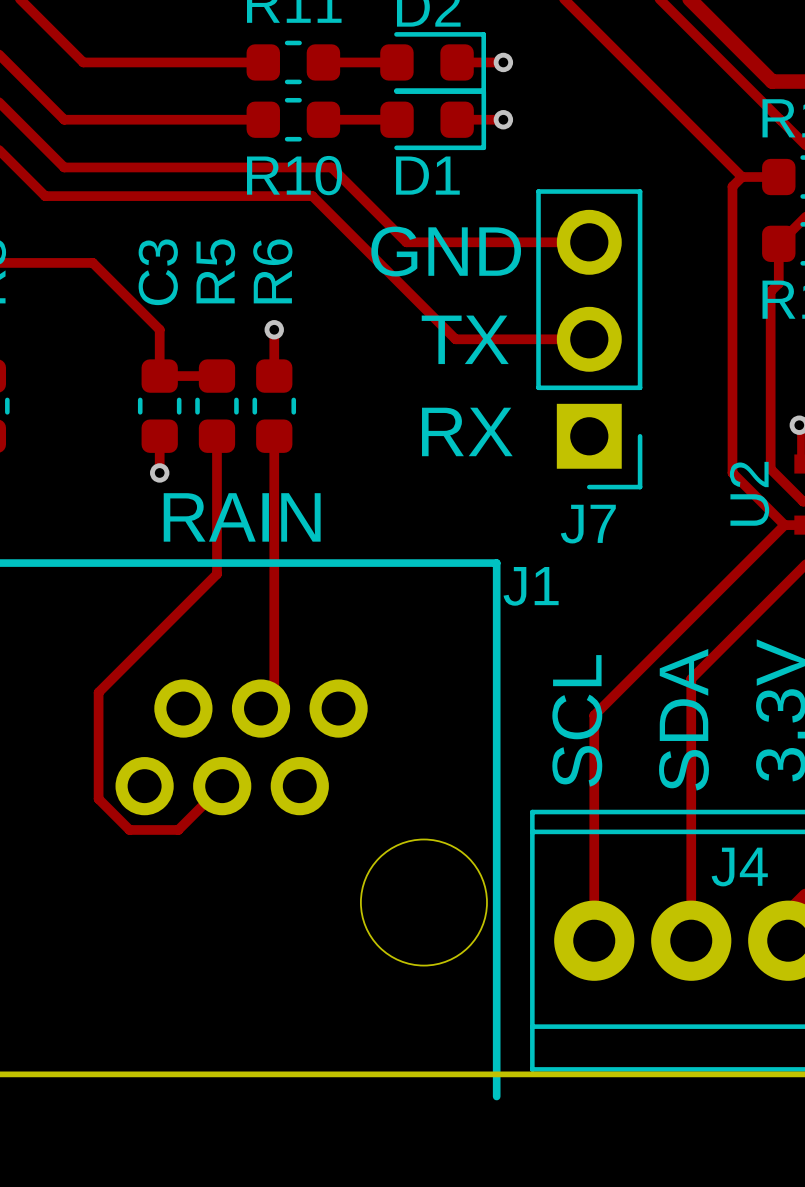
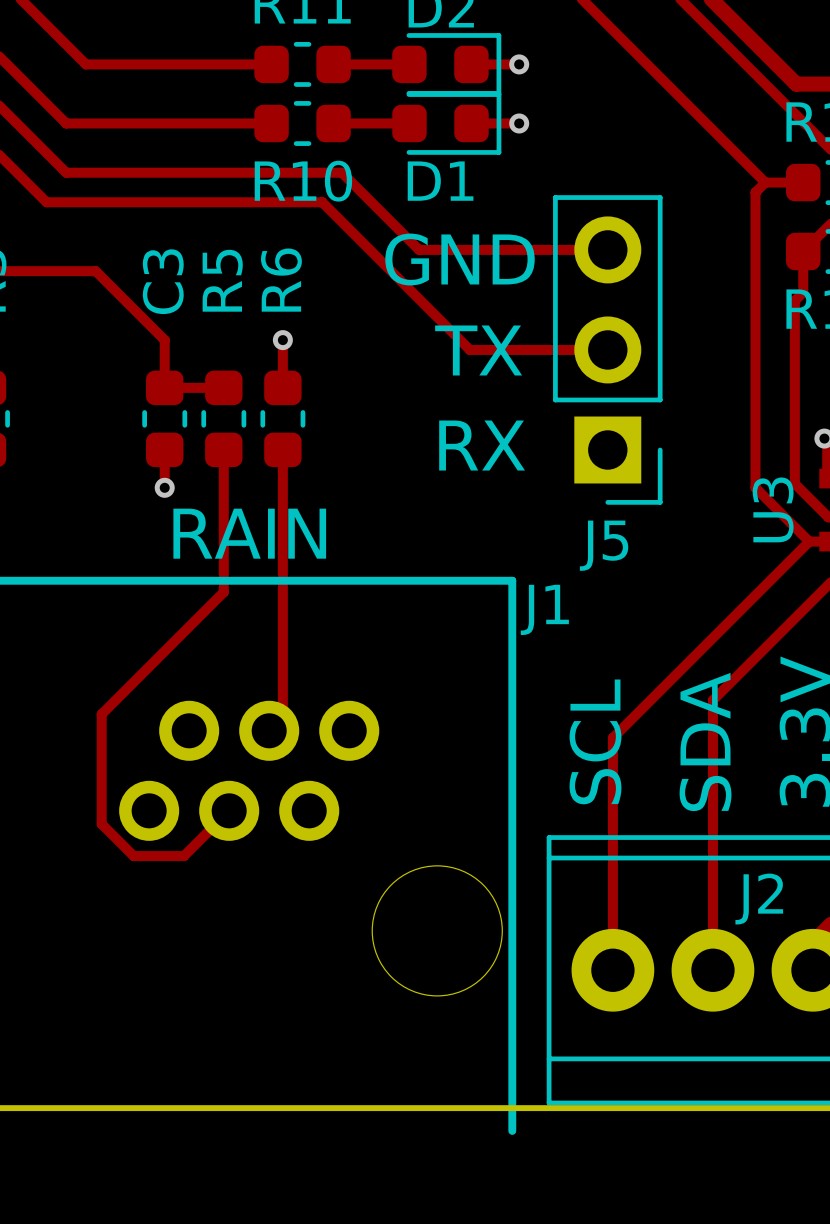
U2 name: U2 (749, 493) -> U3 (773, 509)
J7 name: J7 (588, 524) -> J5 (604, 545)
J4 name: J4 (739, 867) -> J2 (759, 899)

